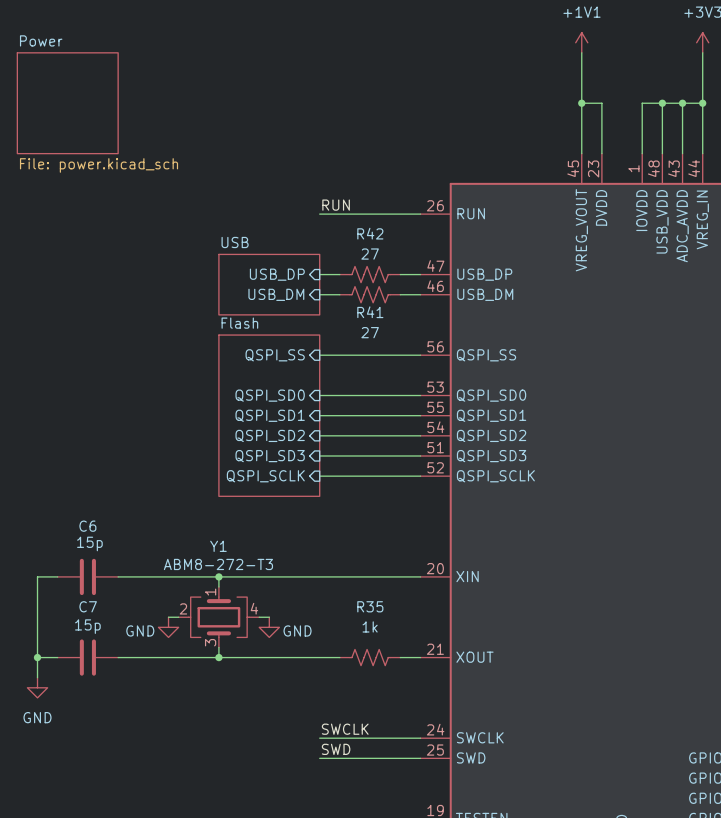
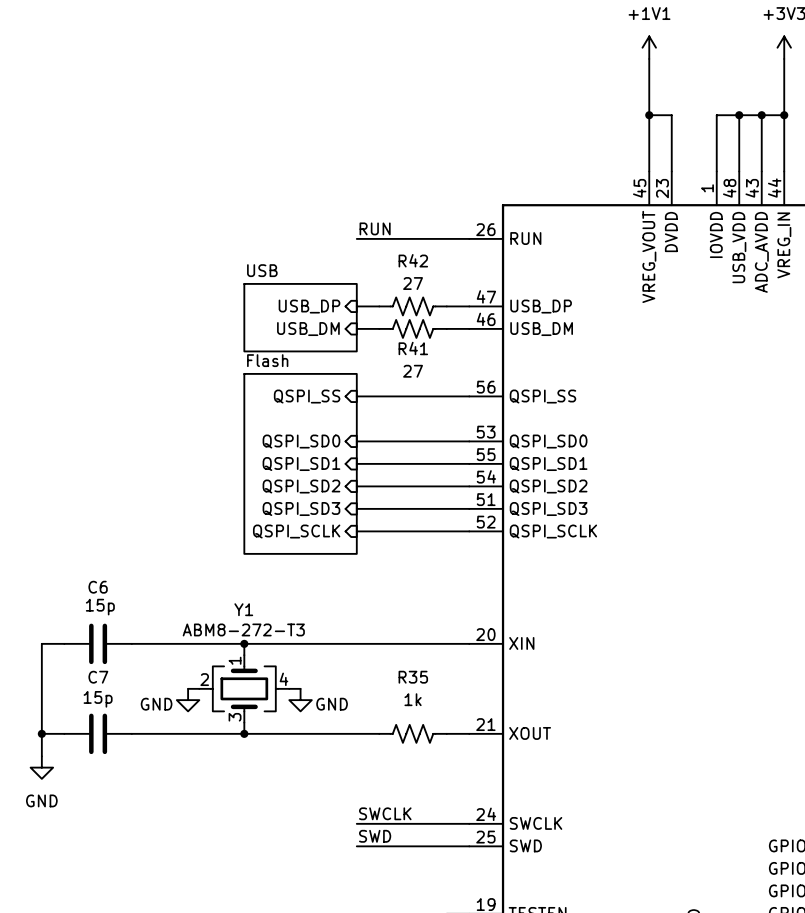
sheet Power: File: power.kicad_sch (67, 103) -> none

